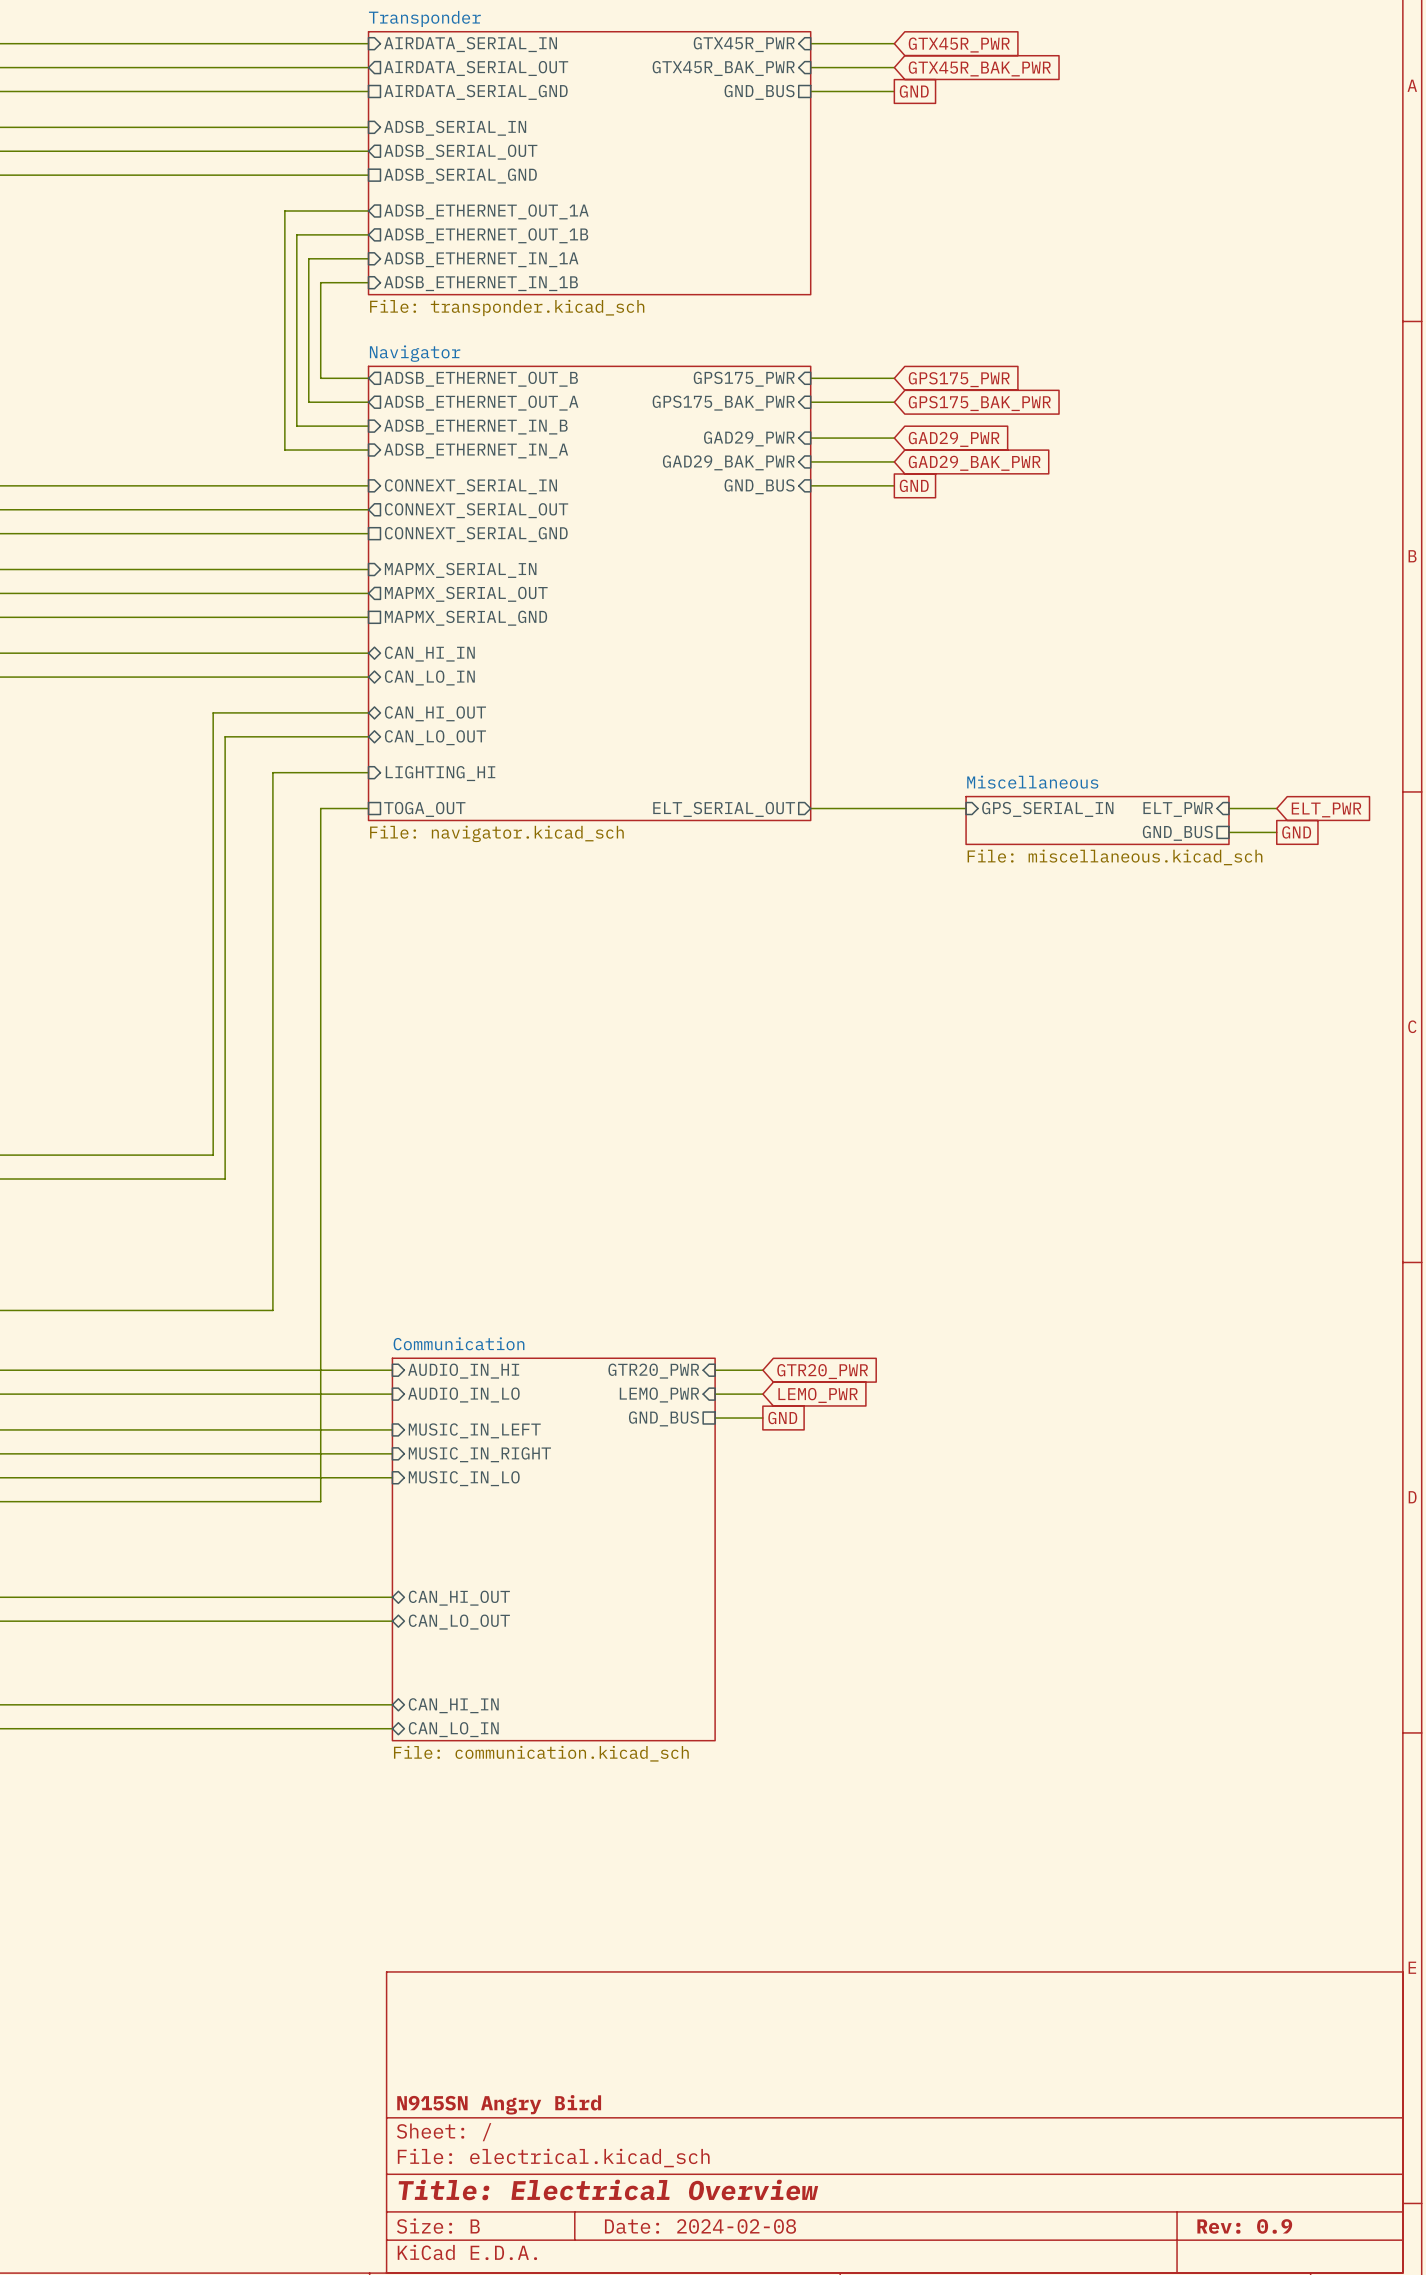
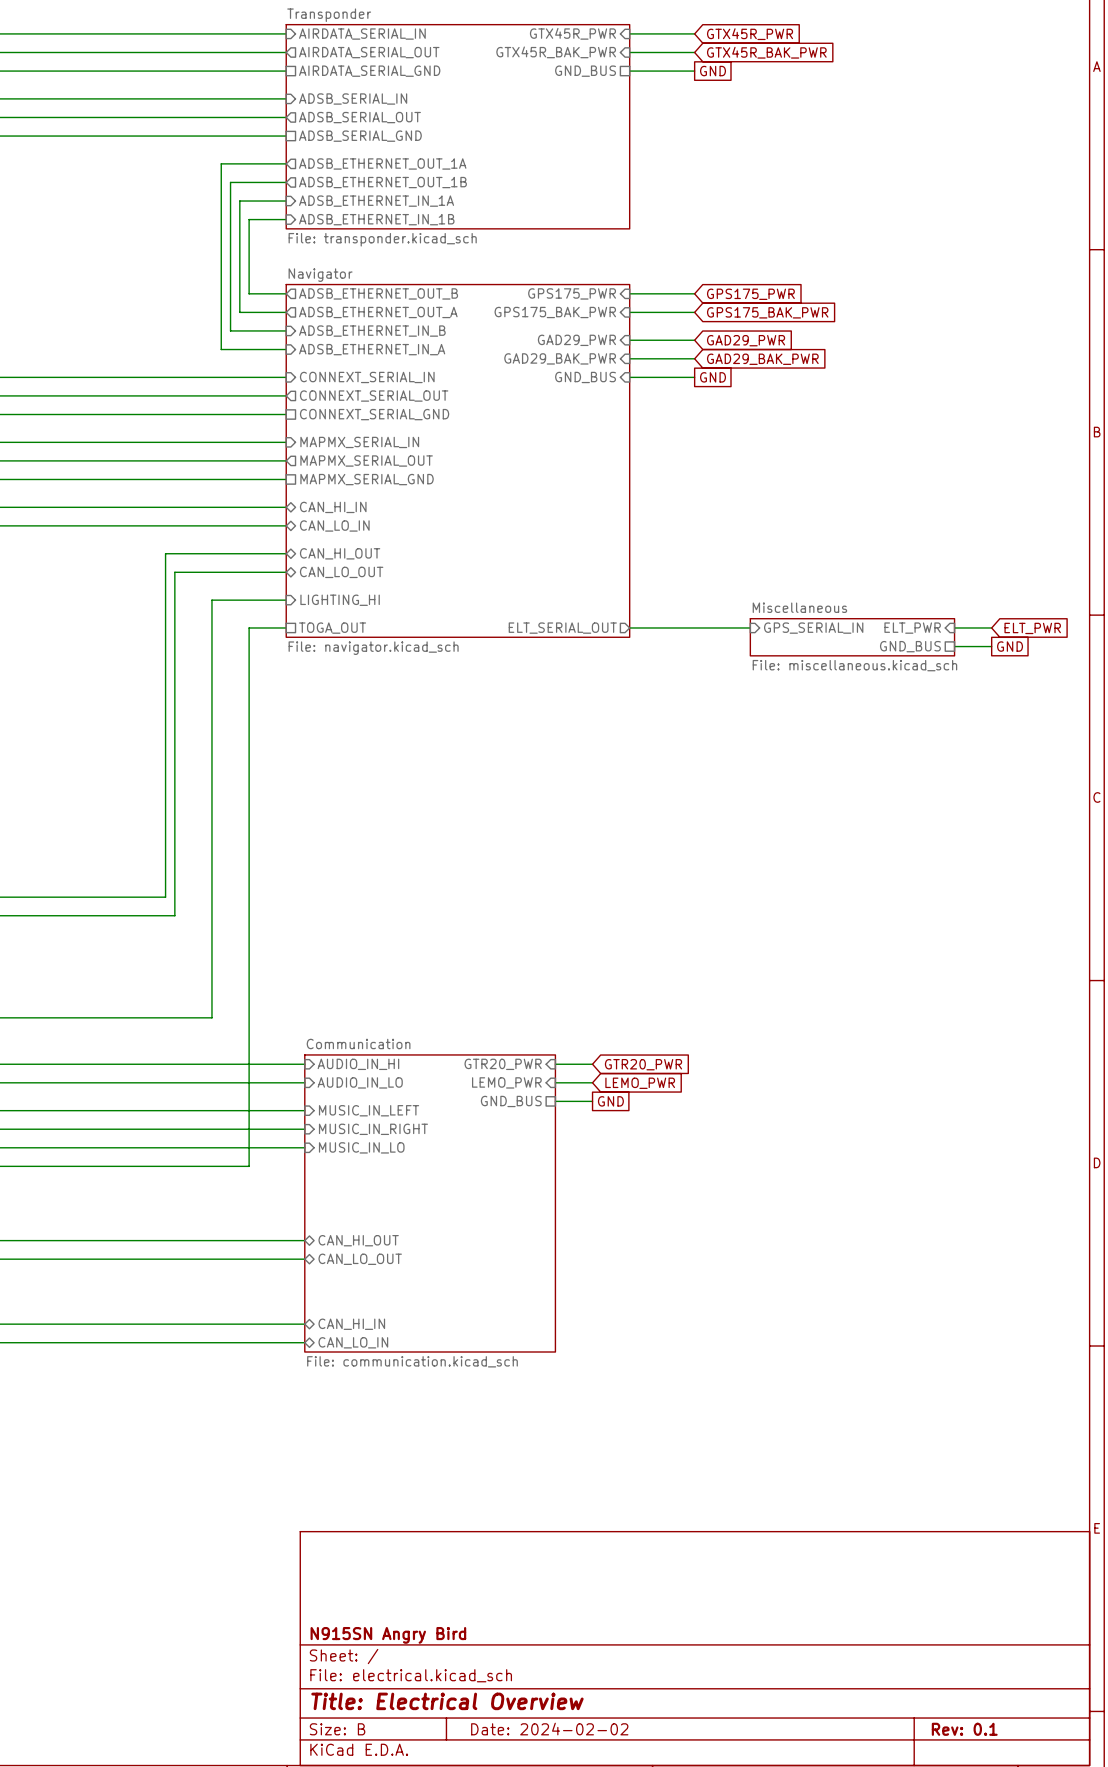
title block: Date: 2024-02-08 (700, 2226) -> Date: 2024-02-02 (549, 1729)
title block: Rev: 0.9 (1244, 2226) -> Rev: 0.1 (964, 1729)

